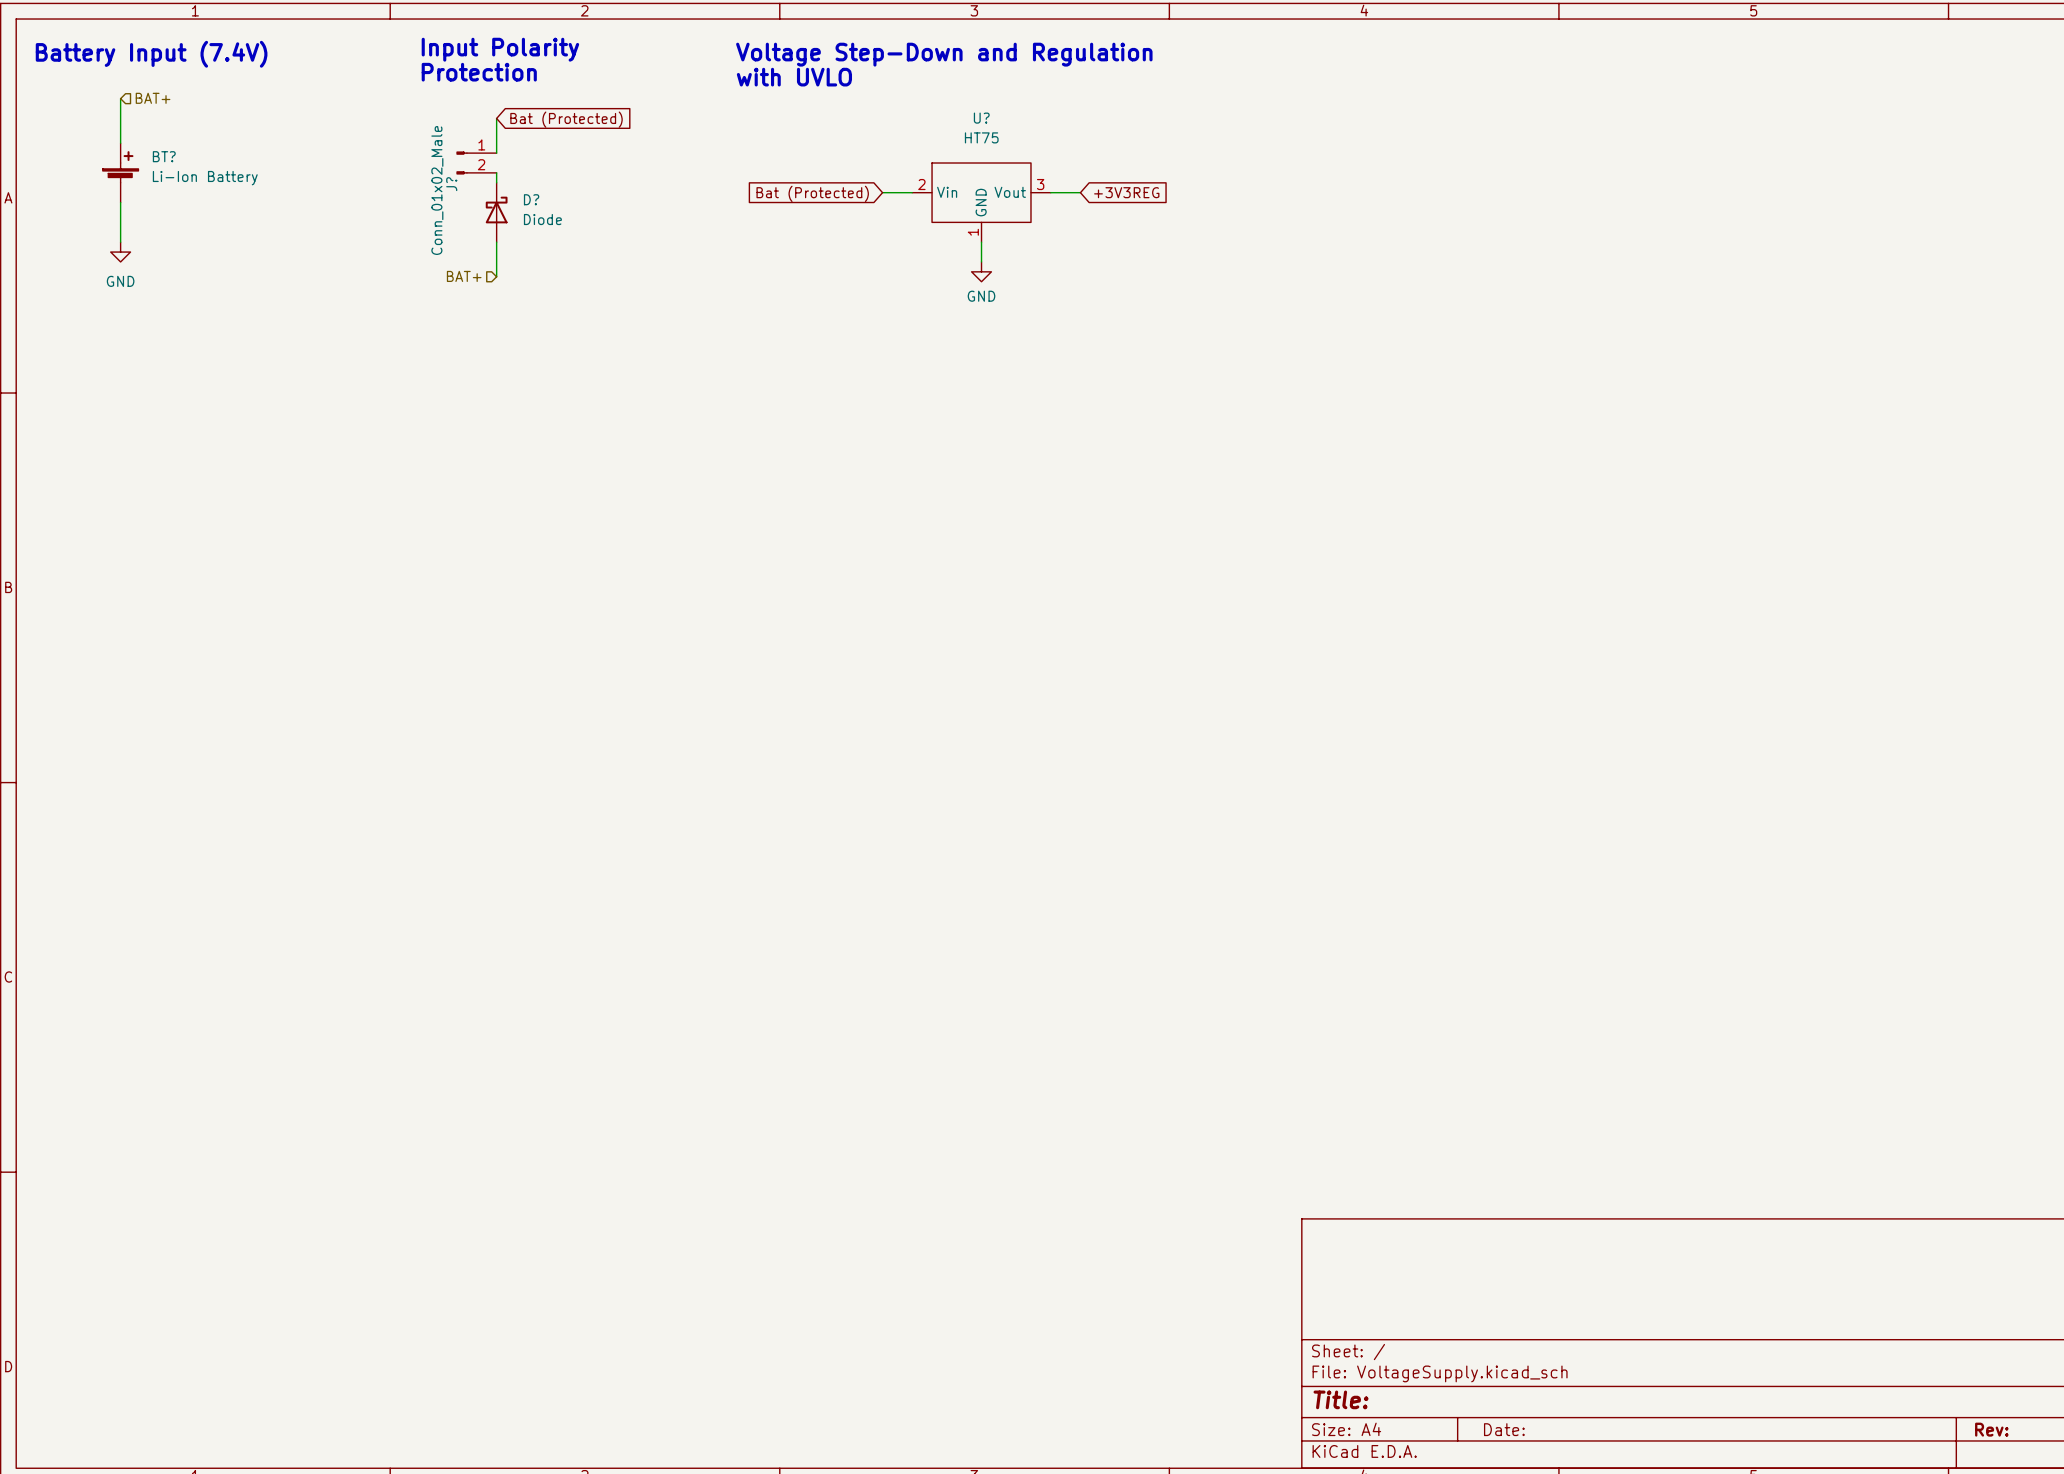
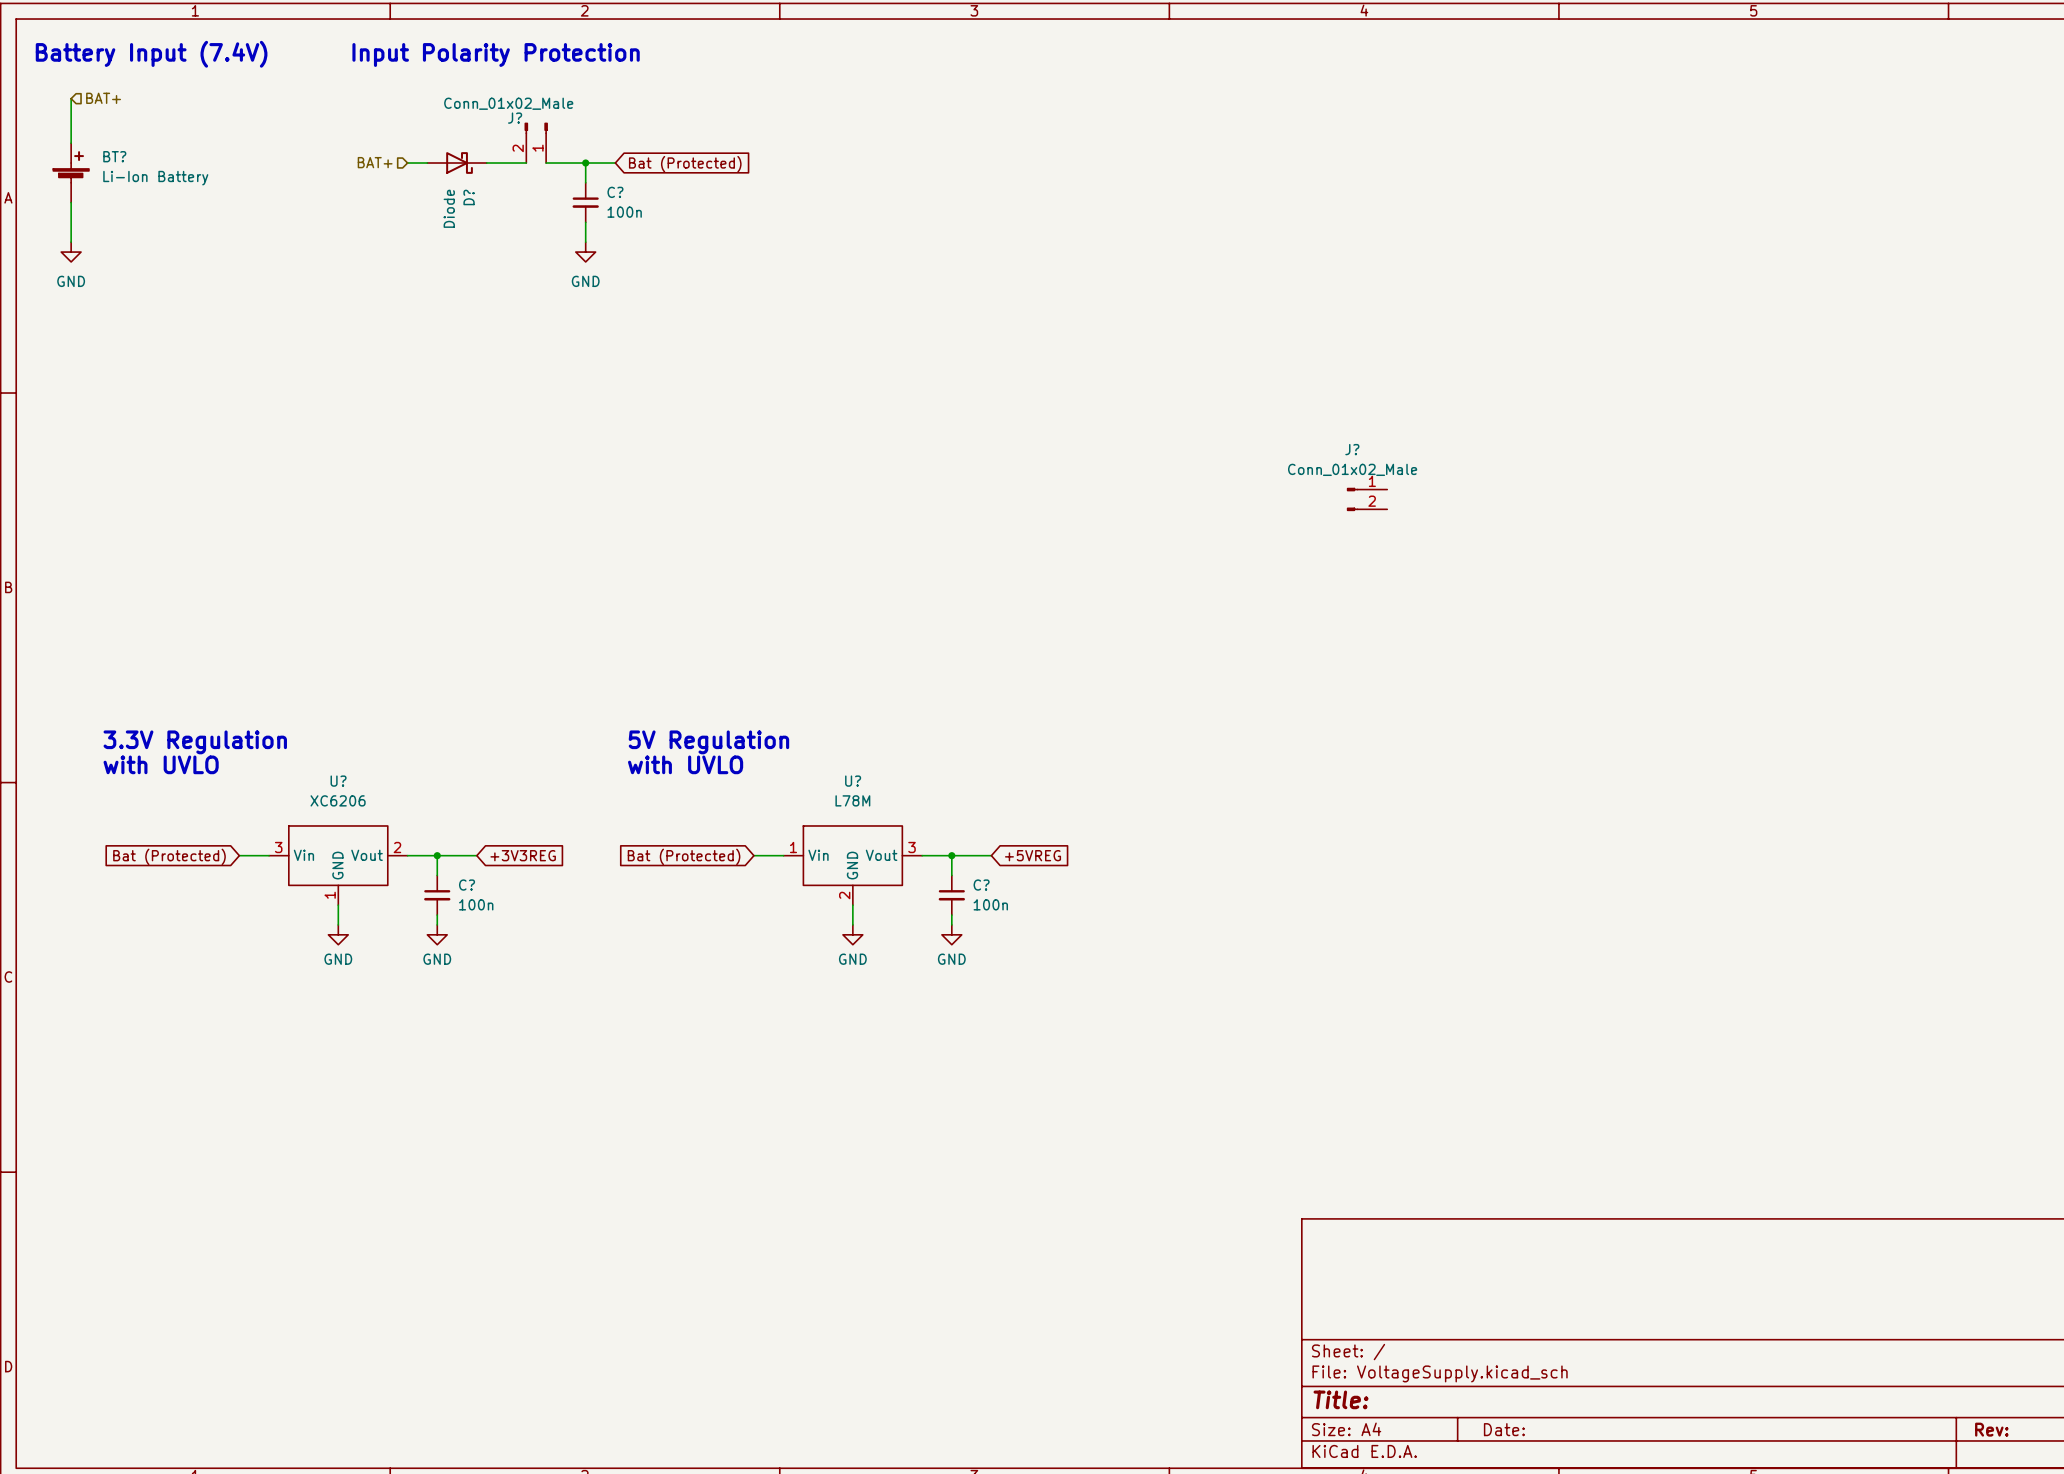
text: Input Polarity (500, 49) -> Input Polarity Protection (496, 55)
text: Voltage Step-Down and Regulation (944, 54) -> none
text: Protection (479, 72) -> none
text: with UVLO (794, 77) -> none
wire: (120, 98) (120, 143) -> (71, 98) (71, 143)
hierarchical label position: BAT+ (153, 98) -> BAT+ (103, 98)
wire: (496, 118) (496, 153) -> none
global label position: Bat (Protected) (566, 119) -> Bat (Protected) (685, 164)
hierarchical label: none -> BAT+ (375, 162)
wire: none -> (407, 163) (427, 163)
J? rotation: 0° (462, 163) -> 90° clockwise (536, 128)
J? position: (476, 163) -> (536, 142)
wire: none -> (486, 163) (526, 163)
wire: none -> (546, 163) (615, 163)
wire: none -> (585, 163) (585, 182)
junction: none -> (585, 163)
BT? position: (120, 172) -> (71, 172)
wire: (496, 172) (496, 182) -> none
wire: (882, 192) (912, 192) -> none
wire: (1050, 192) (1080, 192) -> none
global label: +3V3REG (1126, 192) -> none
global label: Bat (Protected) (812, 193) -> none
wire: (120, 202) (120, 242) -> (71, 202) (71, 242)
C?: none -> 100n (585, 202)
U?: HT75 (981, 202) -> none
D? rotation: 0° (496, 210) -> 90° clockwise (459, 163)
D? position: (496, 212) -> (457, 163)
wire: none -> (585, 222) (585, 242)
wire: (496, 242) (496, 276) -> none
wire: (981, 242) (981, 261) -> none
power symbol position: GND (120, 252) -> GND (71, 252)
power symbol: none -> GND (585, 252)
power symbol: GND (981, 271) -> none
hierarchical label: BAT+ (464, 276) -> none
J?: none -> Conn_01x02_Male (1367, 499)
text: none -> 3.3V Regulation (195, 742)
text: none -> 5V Regulation (708, 742)
text: none -> with UVLO (161, 764)
text: none -> with UVLO (685, 764)
wire: none -> (239, 855) (269, 855)
wire: none -> (407, 855) (476, 855)
wire: none -> (437, 855) (437, 875)
junction: none -> (437, 855)
global label: none -> +3V3REG (523, 855)
wire: none -> (753, 855) (783, 855)
wire: none -> (922, 855) (991, 855)
wire: none -> (951, 855) (951, 875)
junction: none -> (951, 855)
global label: none -> +5VREG (1033, 855)
global label: none -> Bat (Protected) (169, 856)
global label: none -> Bat (Protected) (684, 856)
U?: none -> XC6206 (338, 865)
U?: none -> L78M (852, 865)
C?: none -> 100n (437, 895)
C?: none -> 100n (951, 895)
wire: none -> (338, 905) (338, 924)
wire: none -> (852, 905) (852, 924)
wire: none -> (437, 915) (437, 924)
wire: none -> (951, 915) (951, 924)
power symbol: none -> GND (338, 934)
power symbol: none -> GND (437, 934)
power symbol: none -> GND (852, 934)
power symbol: none -> GND (951, 934)

